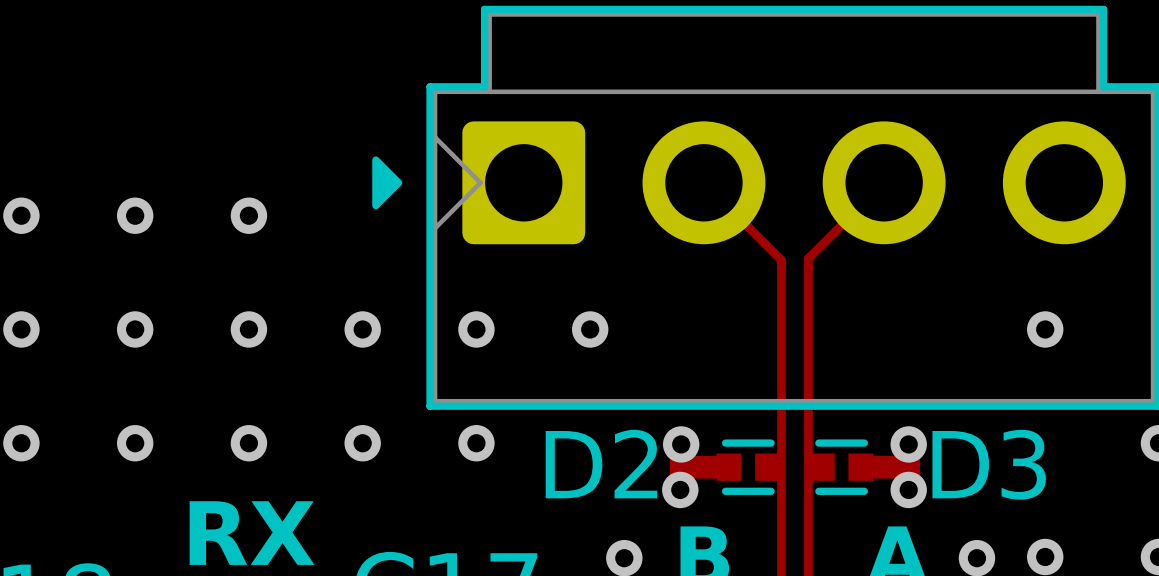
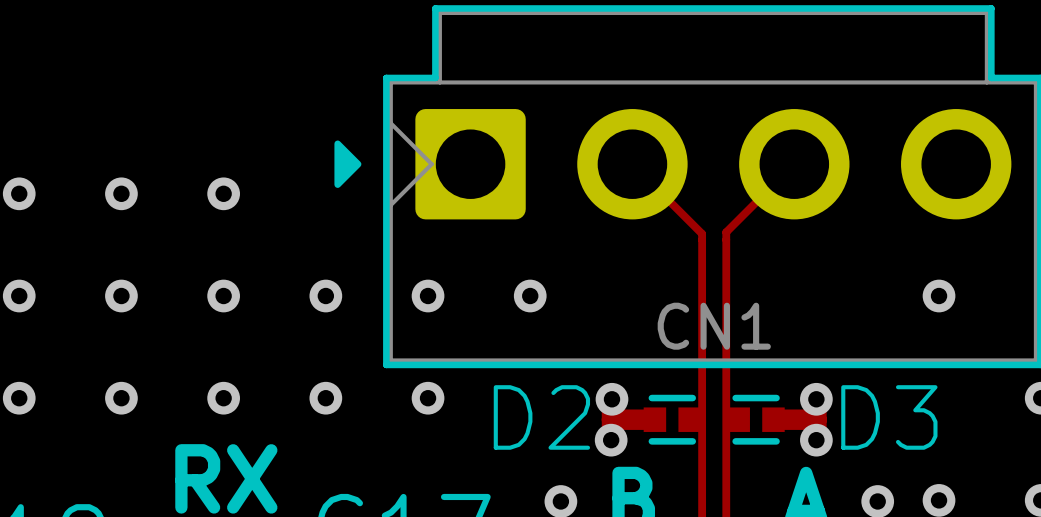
CN1 name: none -> CN1 (714, 326)

